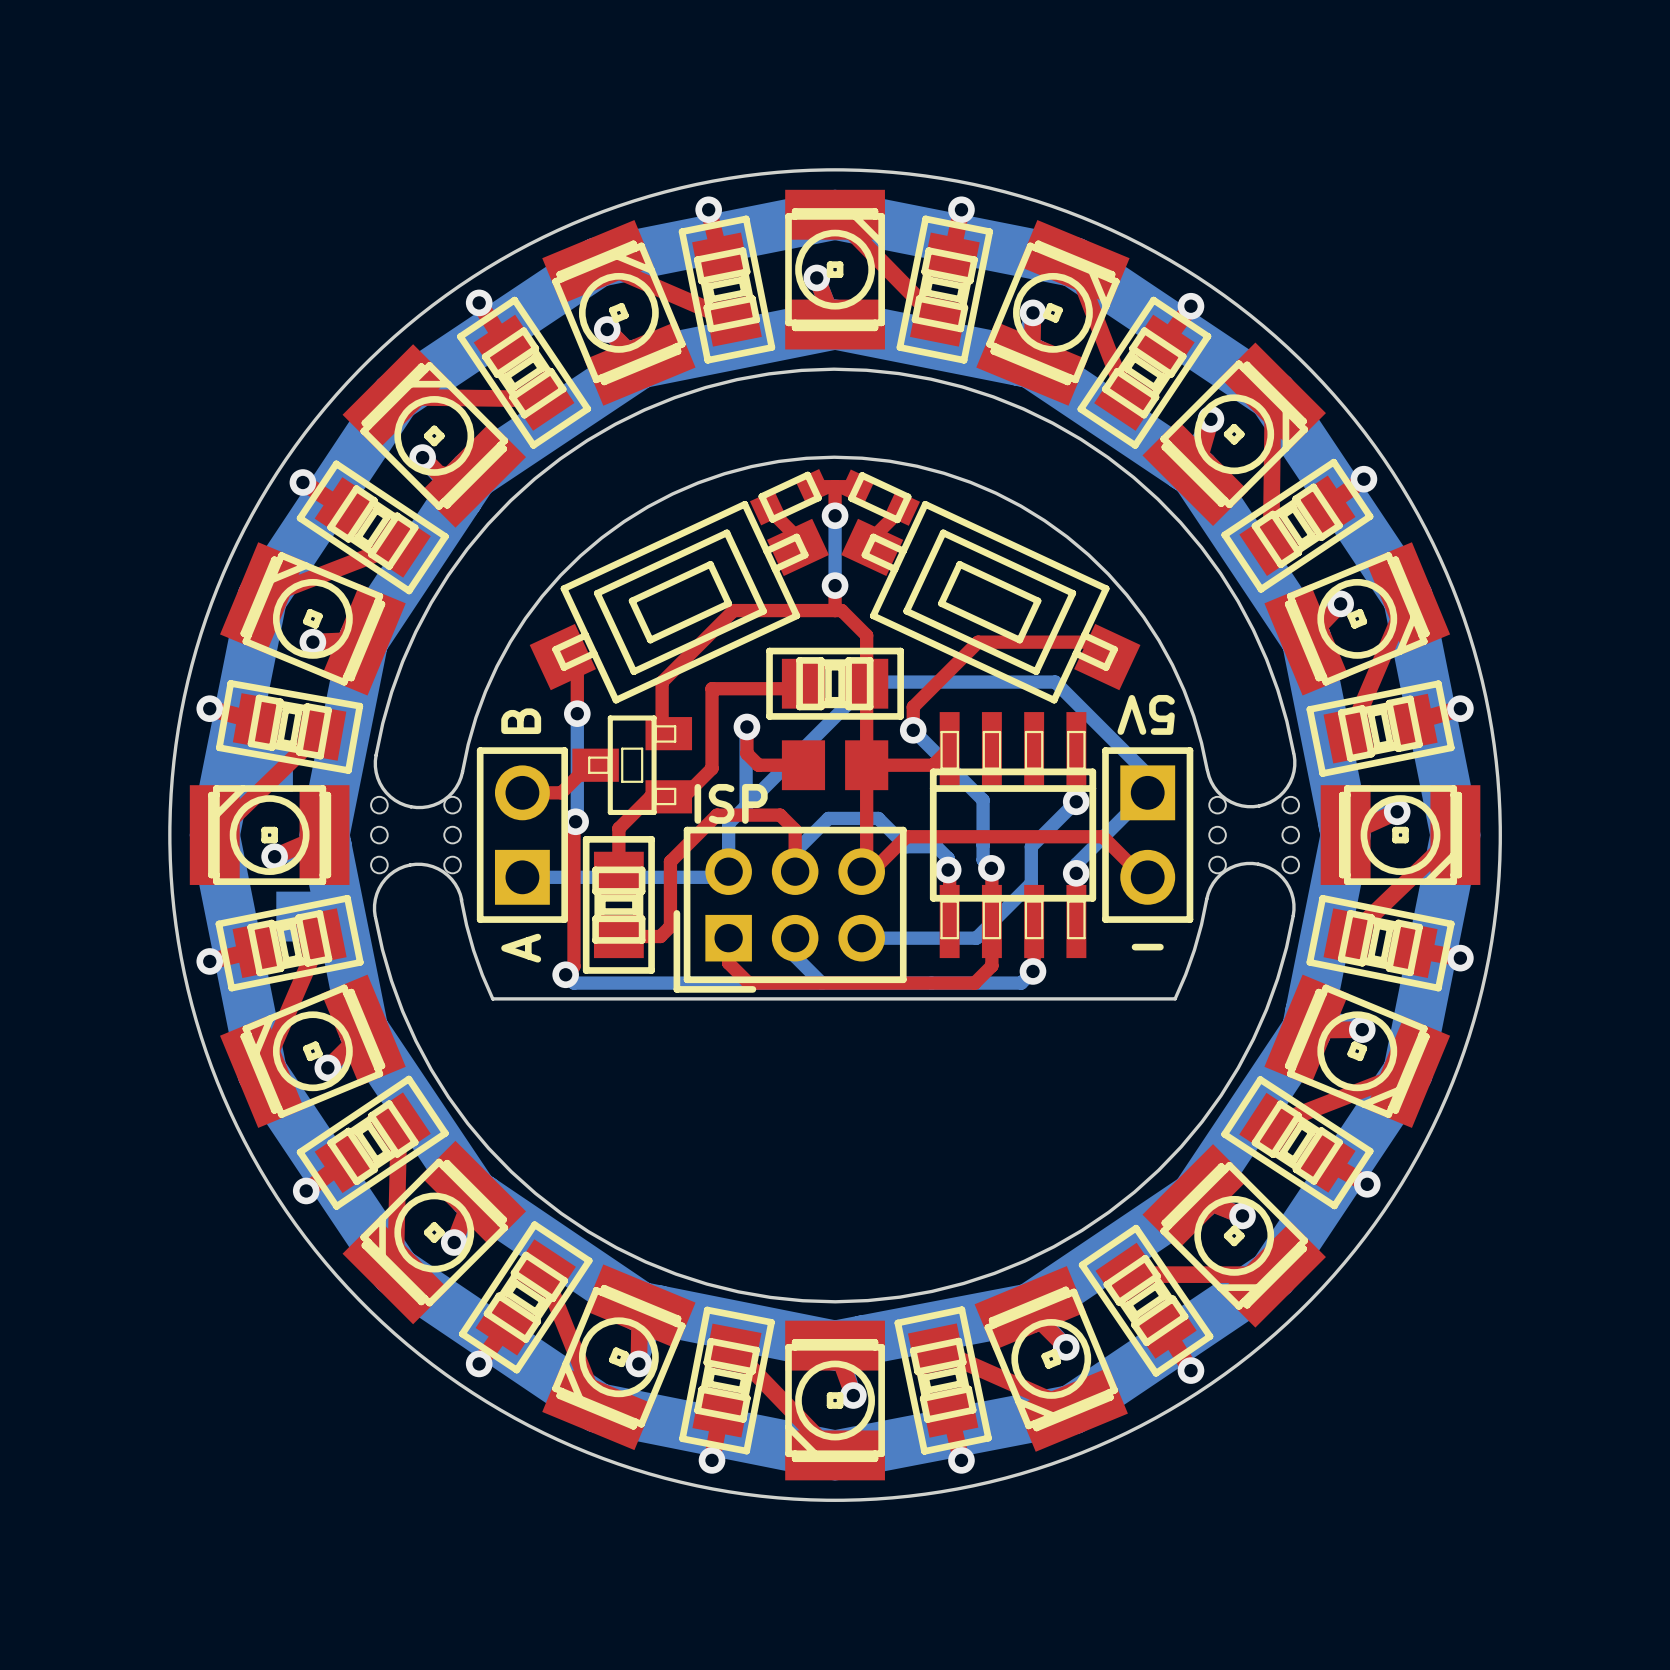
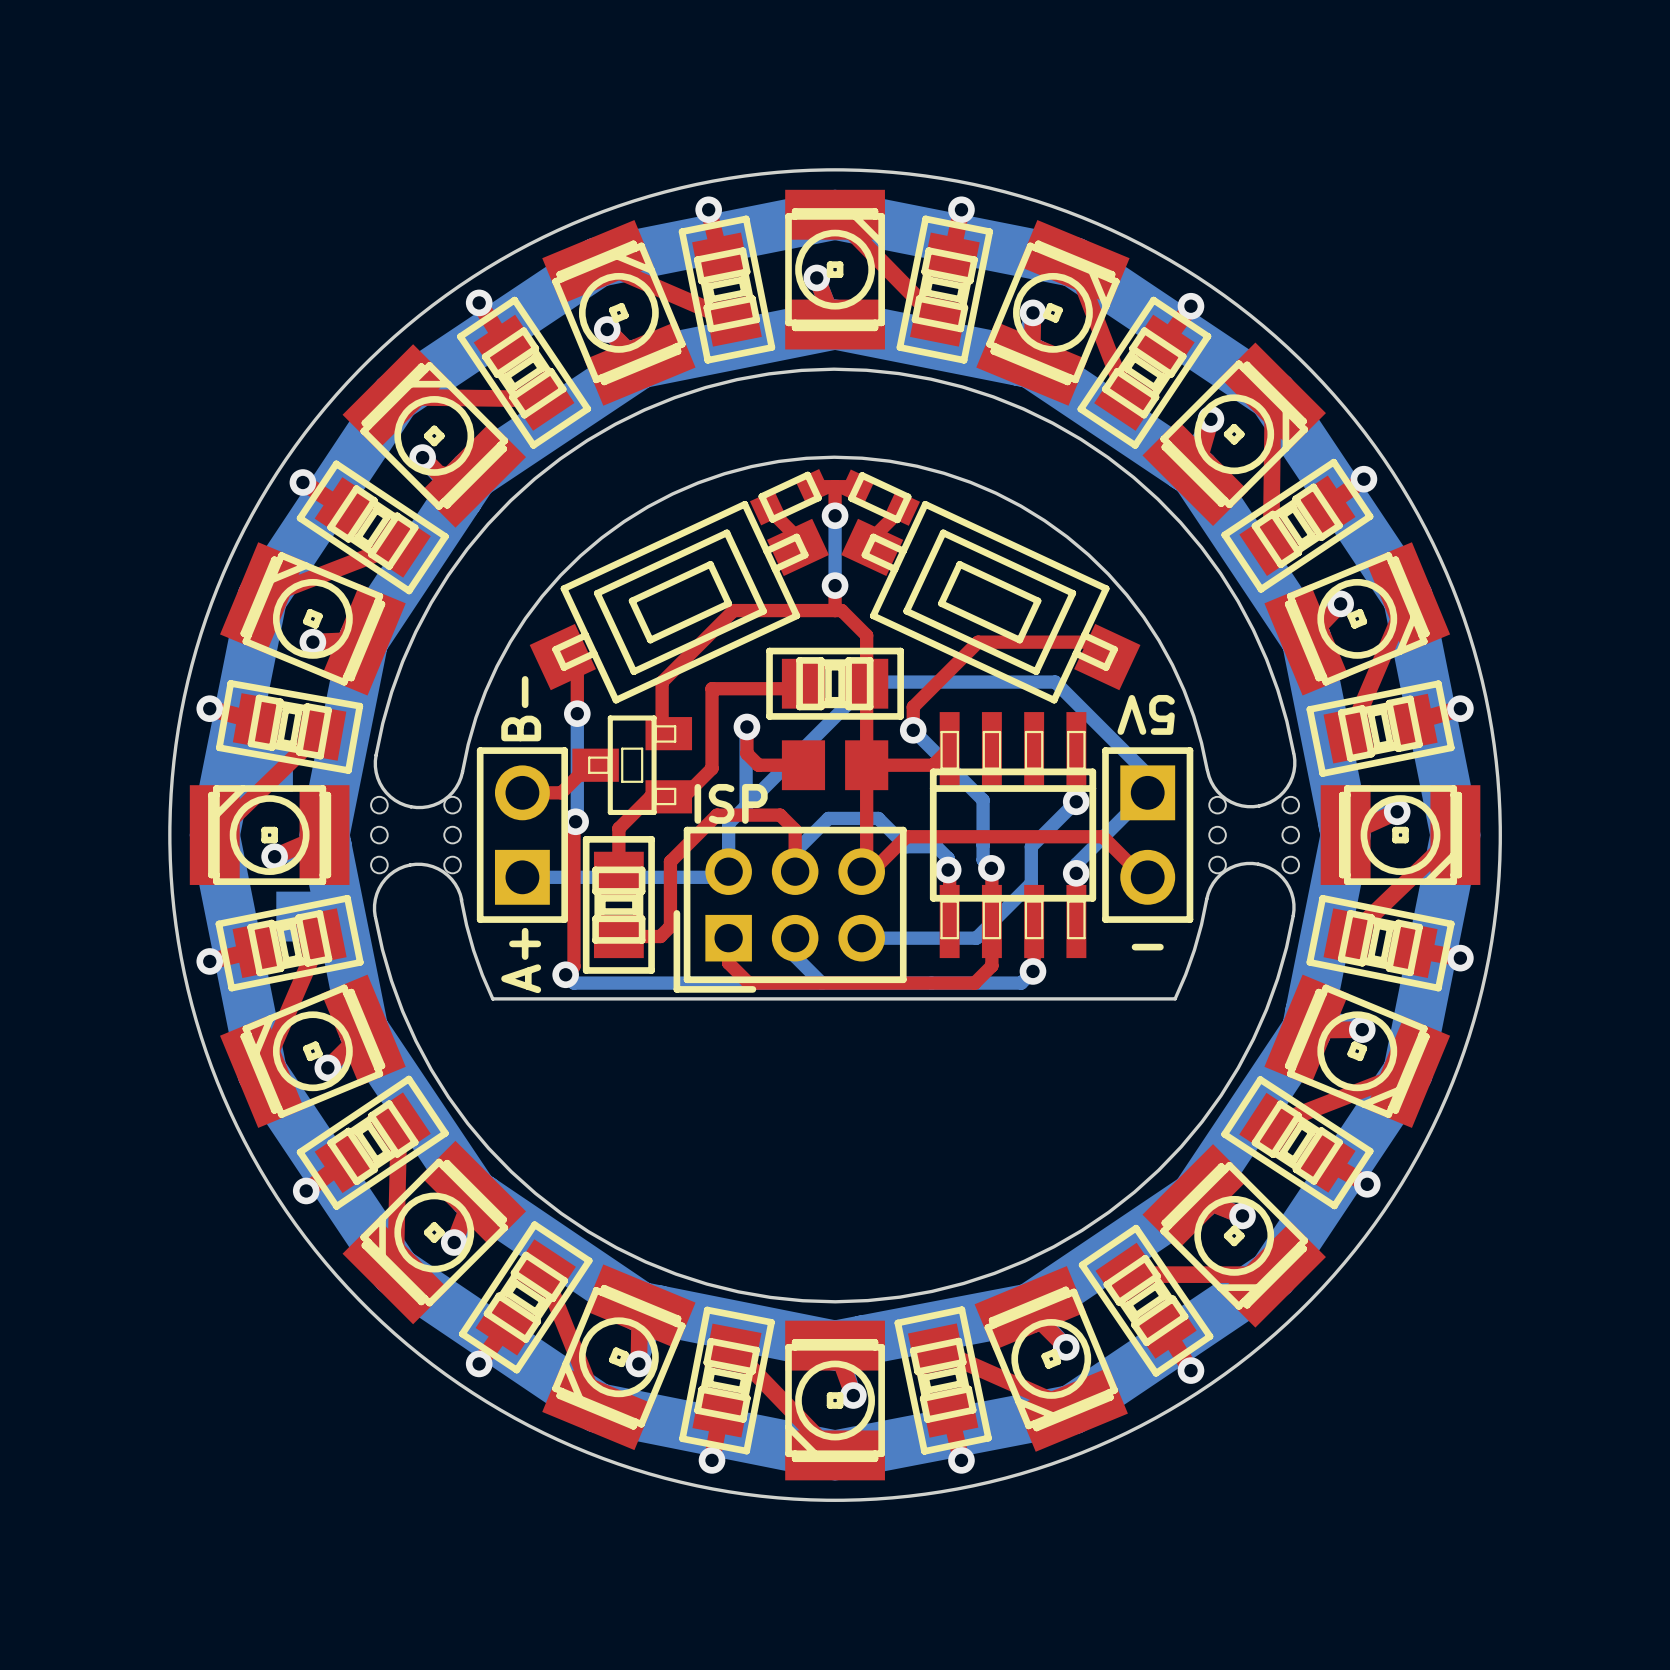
text: B (521, 721) -> B- (521, 708)
text: A (521, 948) -> A+ (521, 960)

